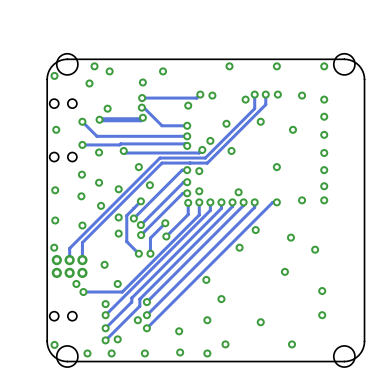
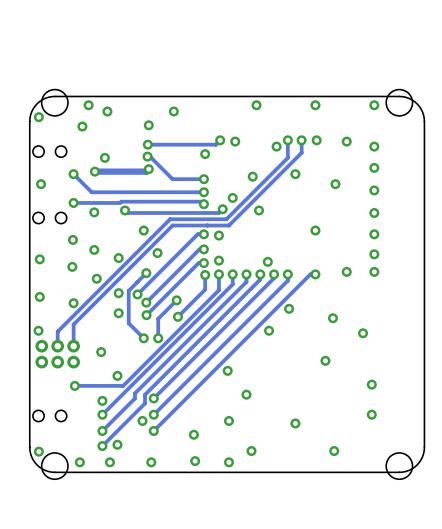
via: (76, 283) -> none

